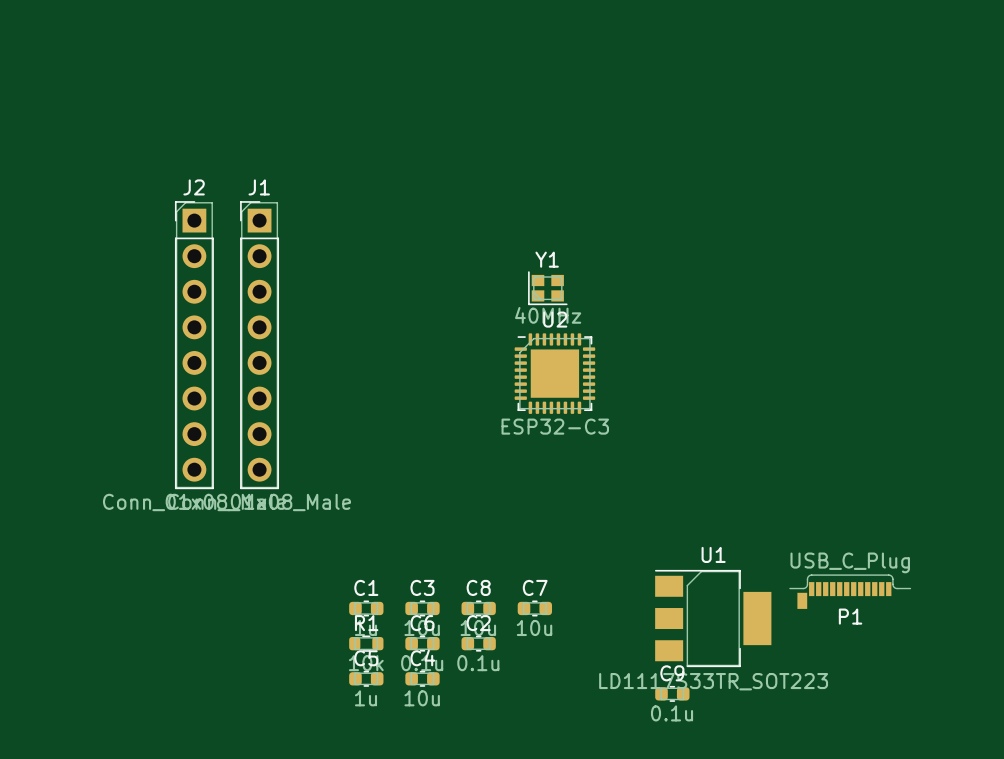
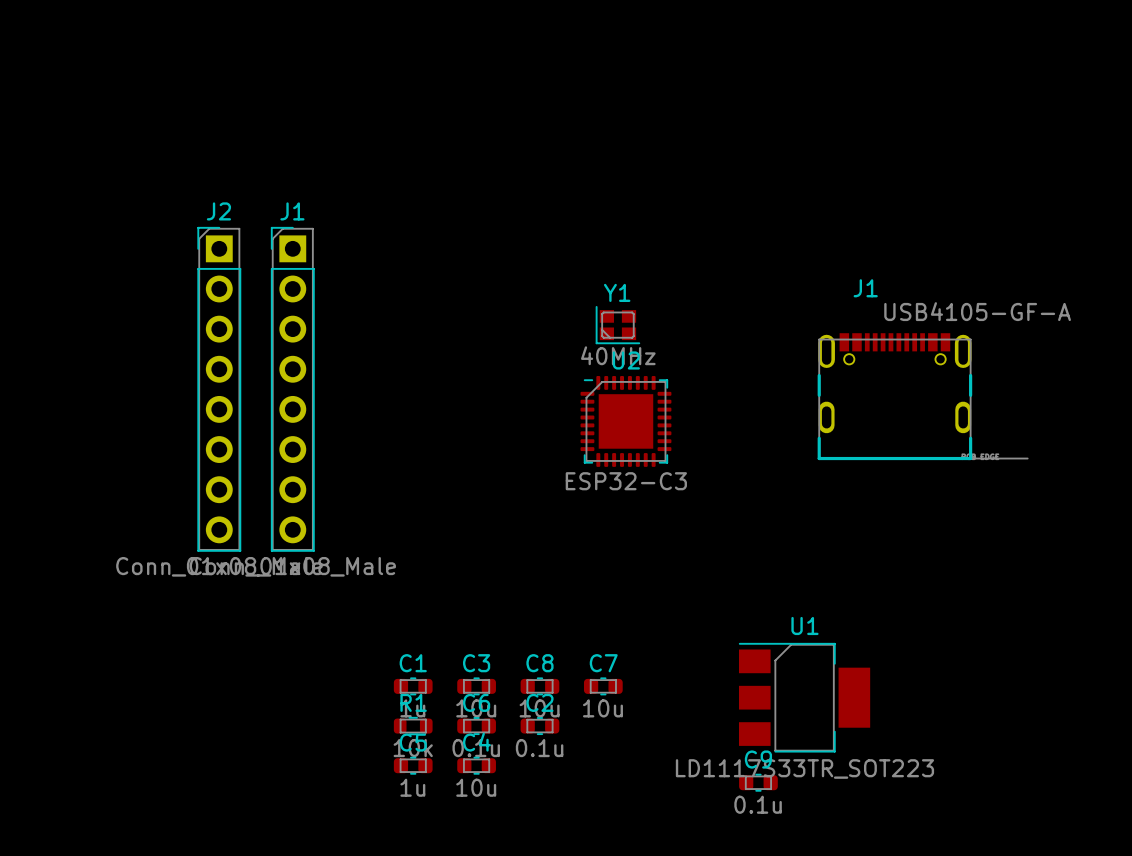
J1: none -> USB4105-GF-A (923, 396)
P1: USB_C_Plug (850, 591) -> none

